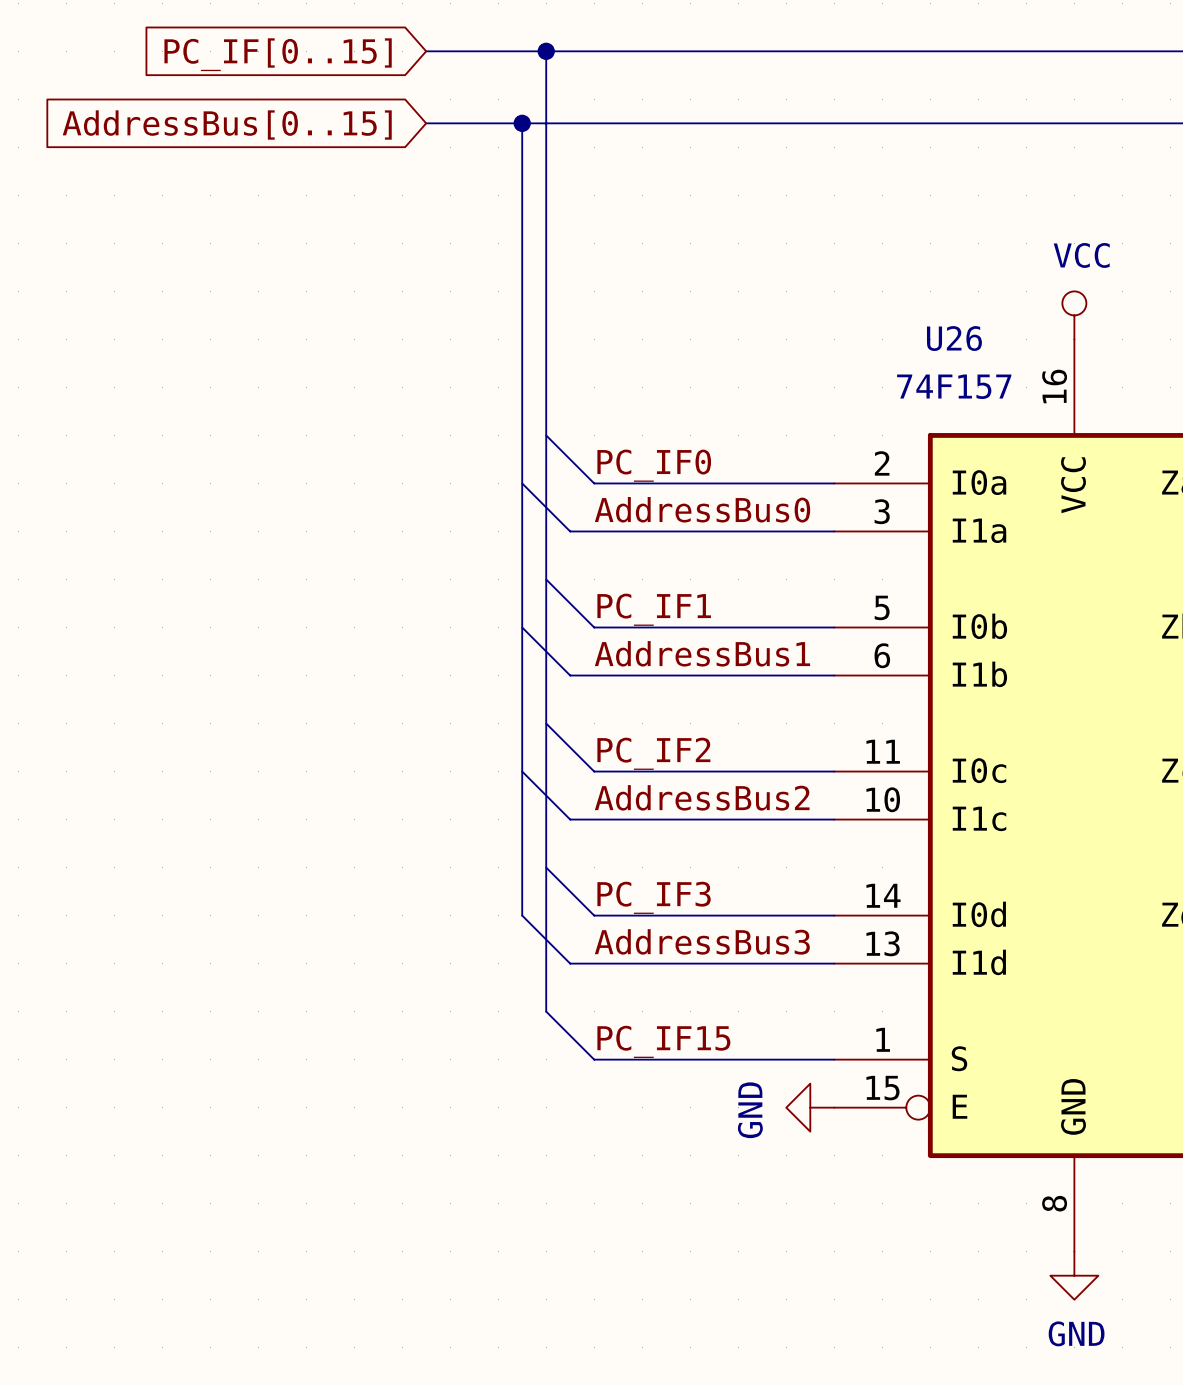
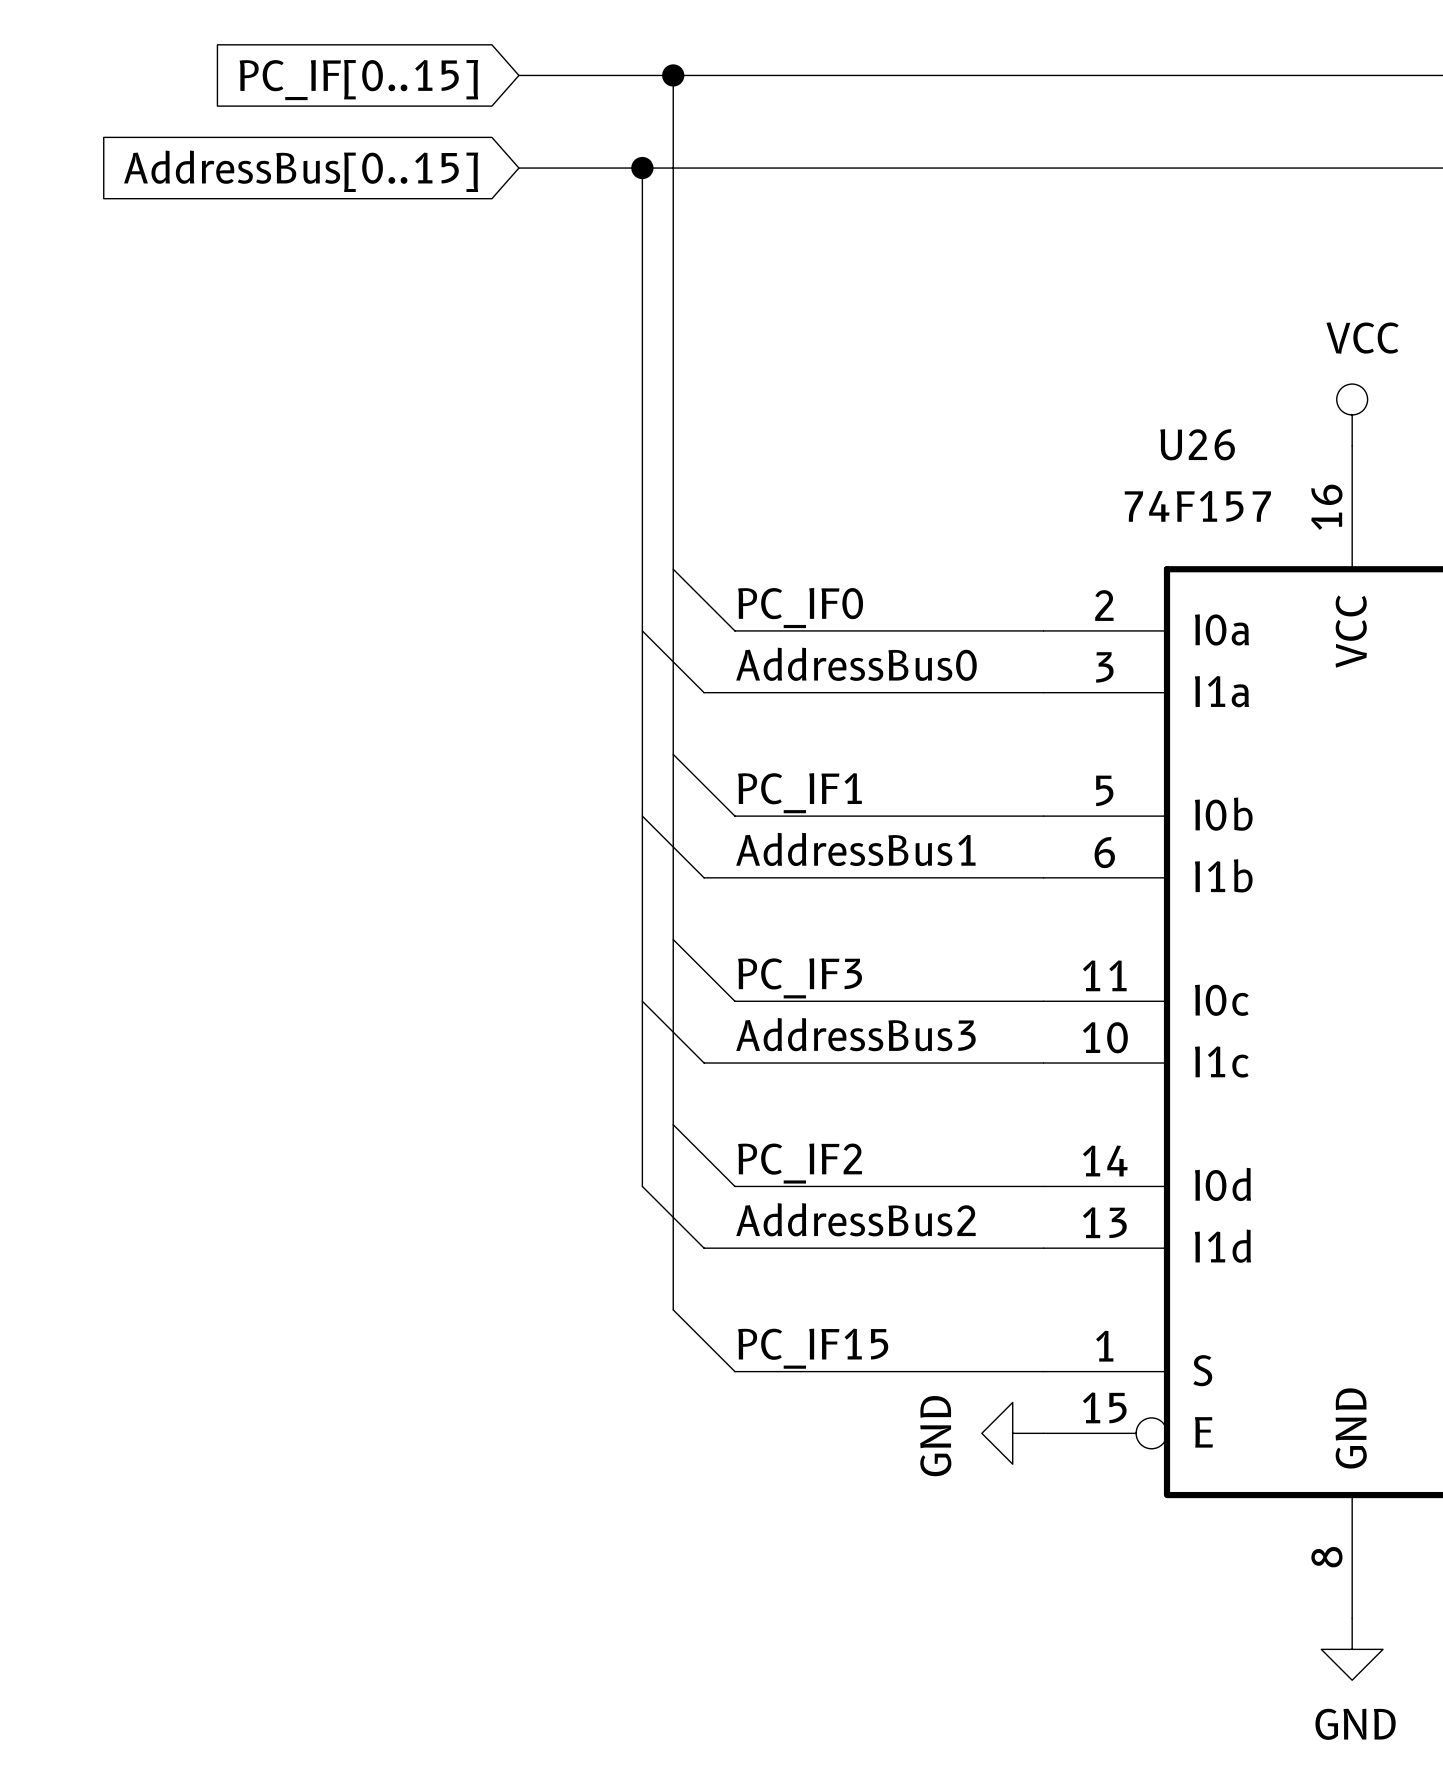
label: PC_IF2 (653, 753) -> PC_IF3 (800, 978)
label: AddressBus2 (702, 797) -> AddressBus3 (855, 1034)
label: PC_IF3 (654, 897) -> PC_IF2 (800, 1163)
label: AddressBus3 (702, 941) -> AddressBus2 (855, 1219)

